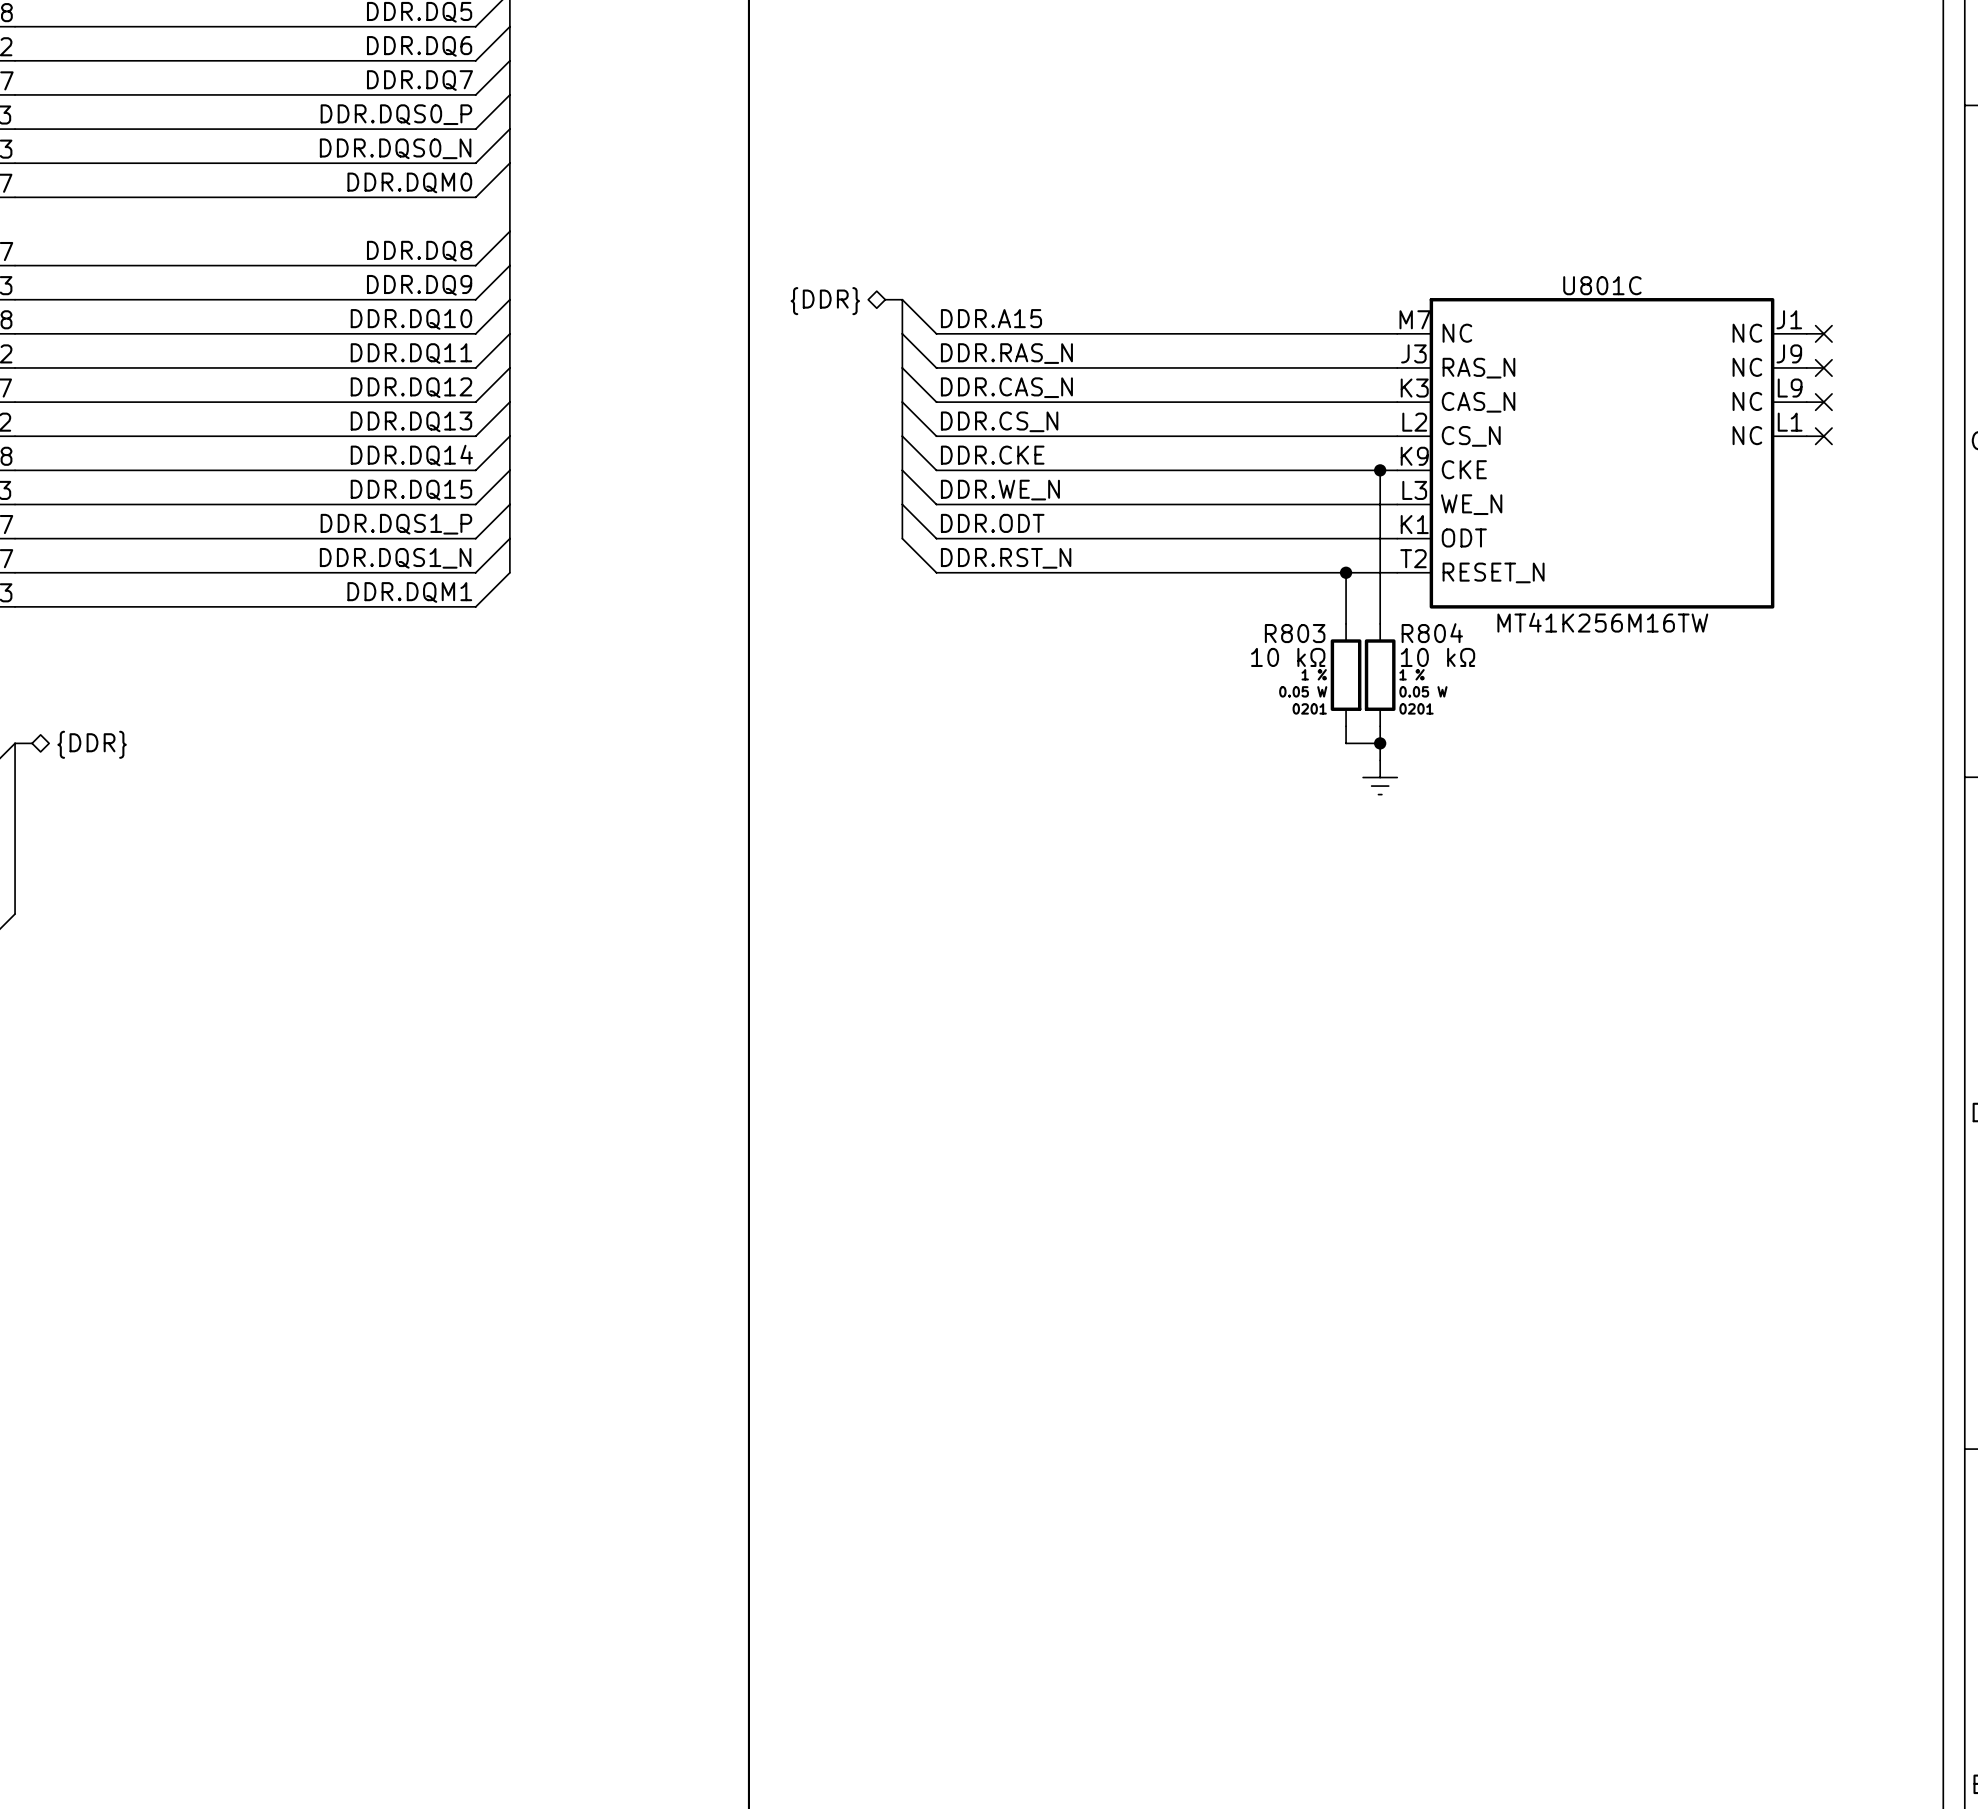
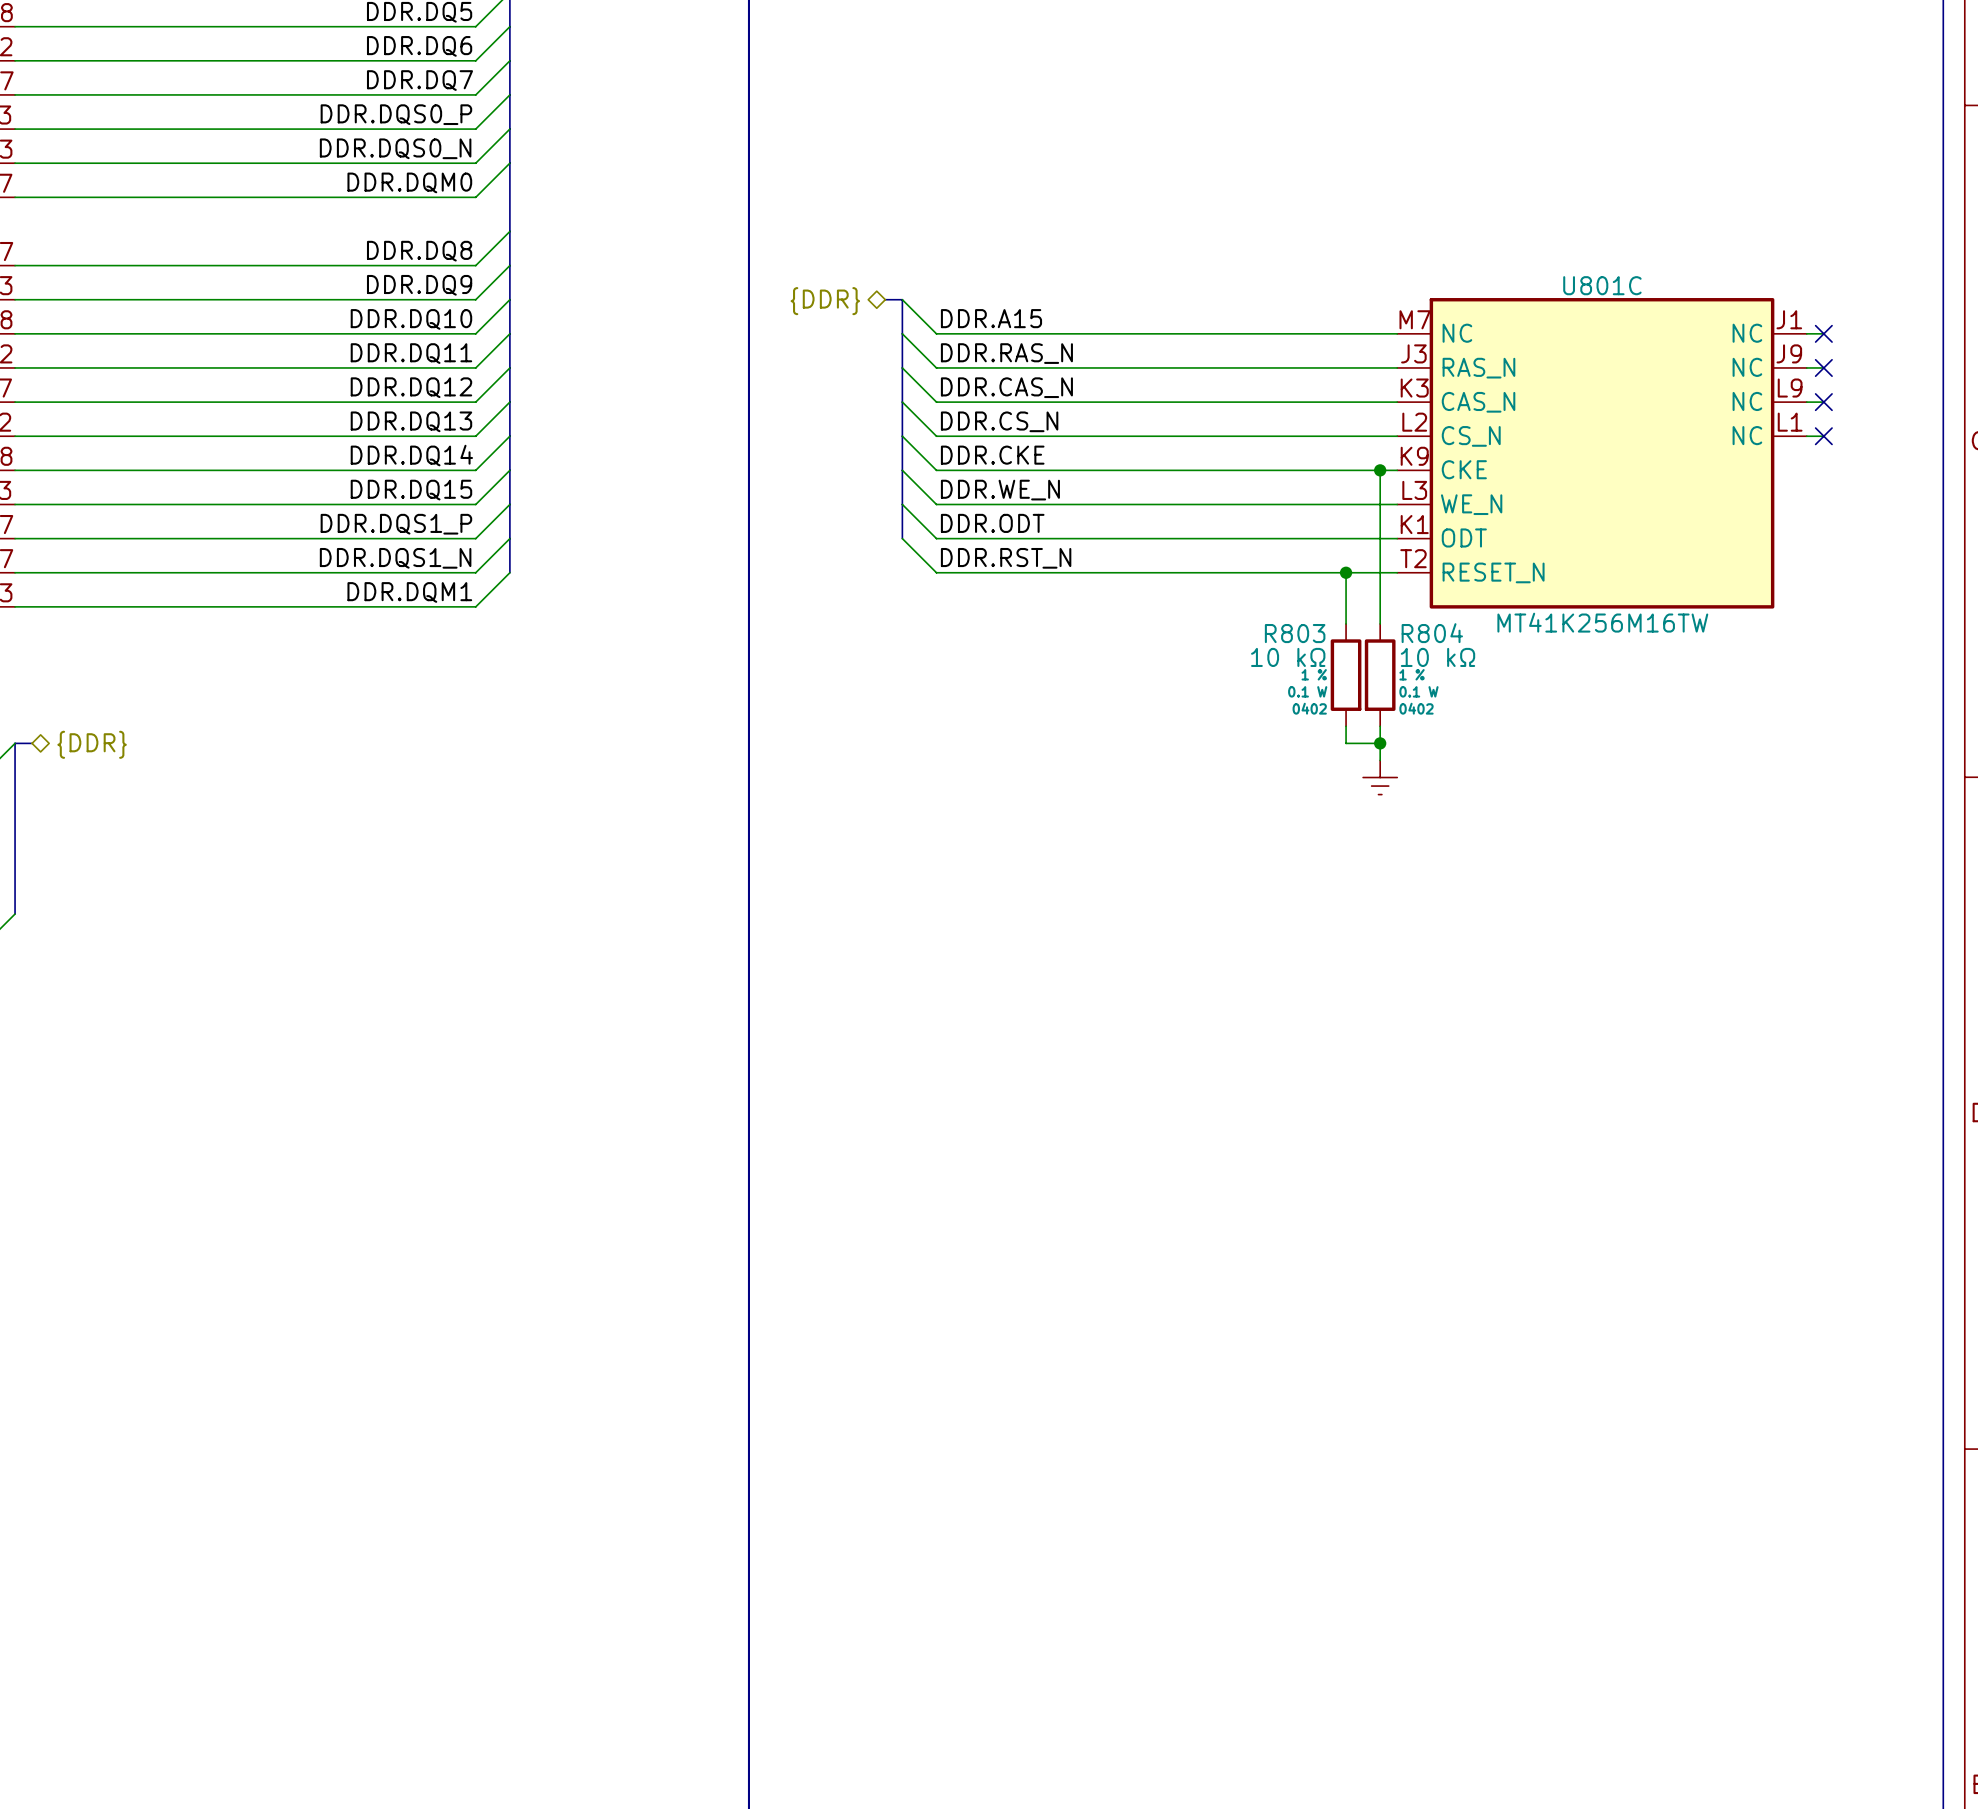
R803 text: 0.05 W (1303, 691) -> 0.1 W (1307, 691)
R804 text: 0.05 W (1423, 691) -> 0.1 W (1418, 691)
R803 text: 0201 (1309, 708) -> 0402 (1309, 708)
R804 text: 0201 (1416, 708) -> 0402 (1416, 708)

